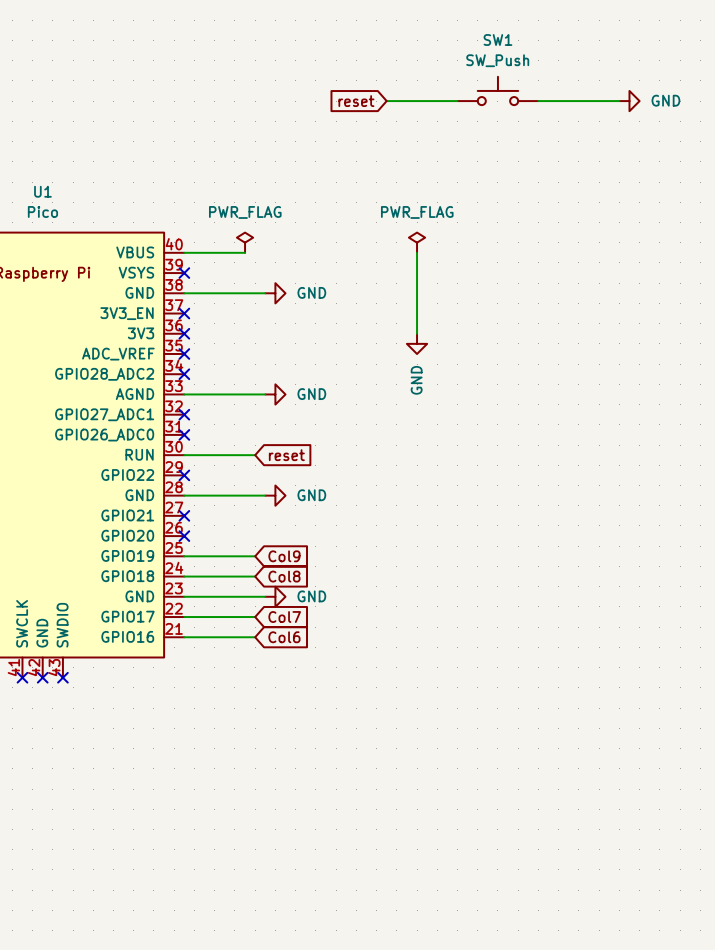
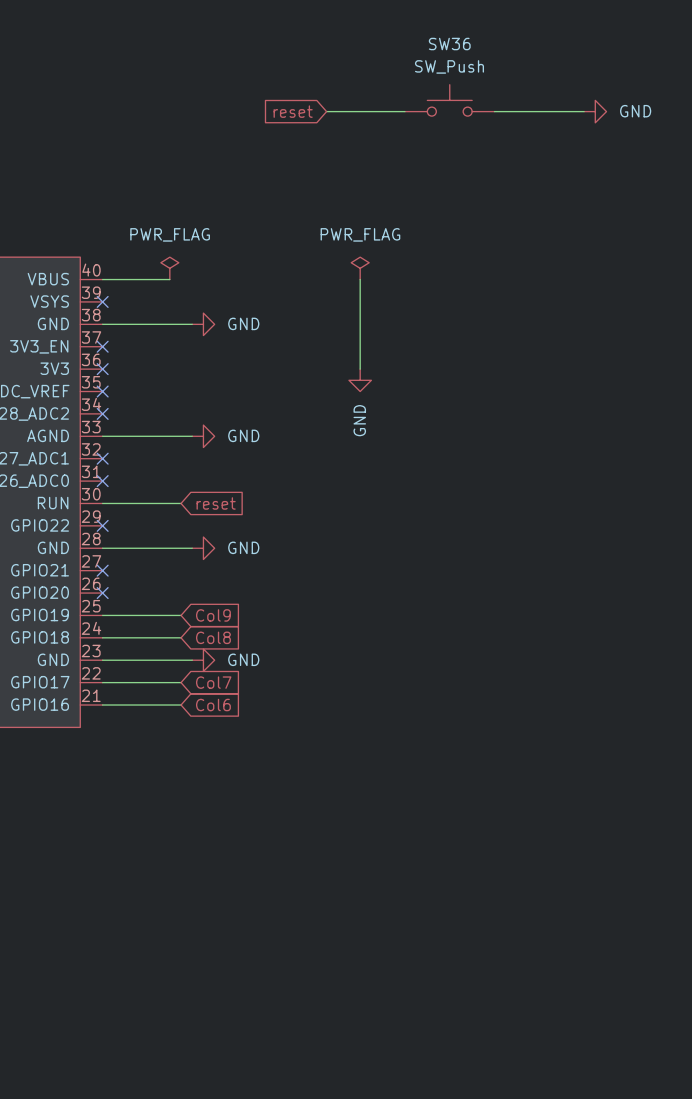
SW1 name: SW1 (497, 39) -> SW36 (449, 44)

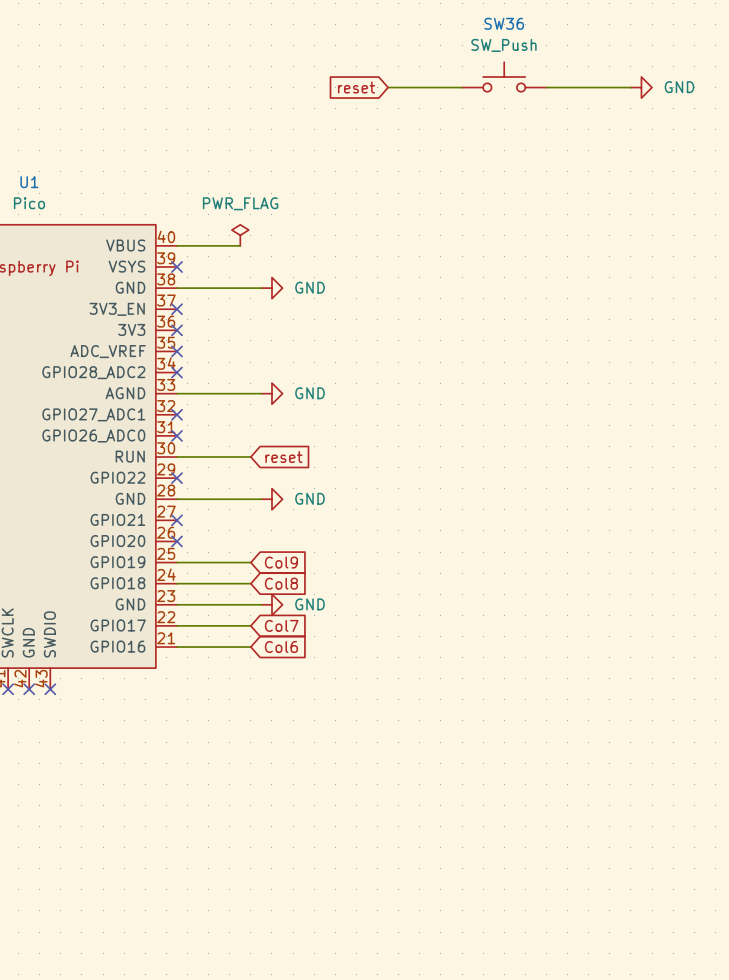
power symbol: PWR_FLAG (360, 268) -> none
wire: (360, 279) (360, 369) -> none
power symbol: GND (360, 380) -> none

